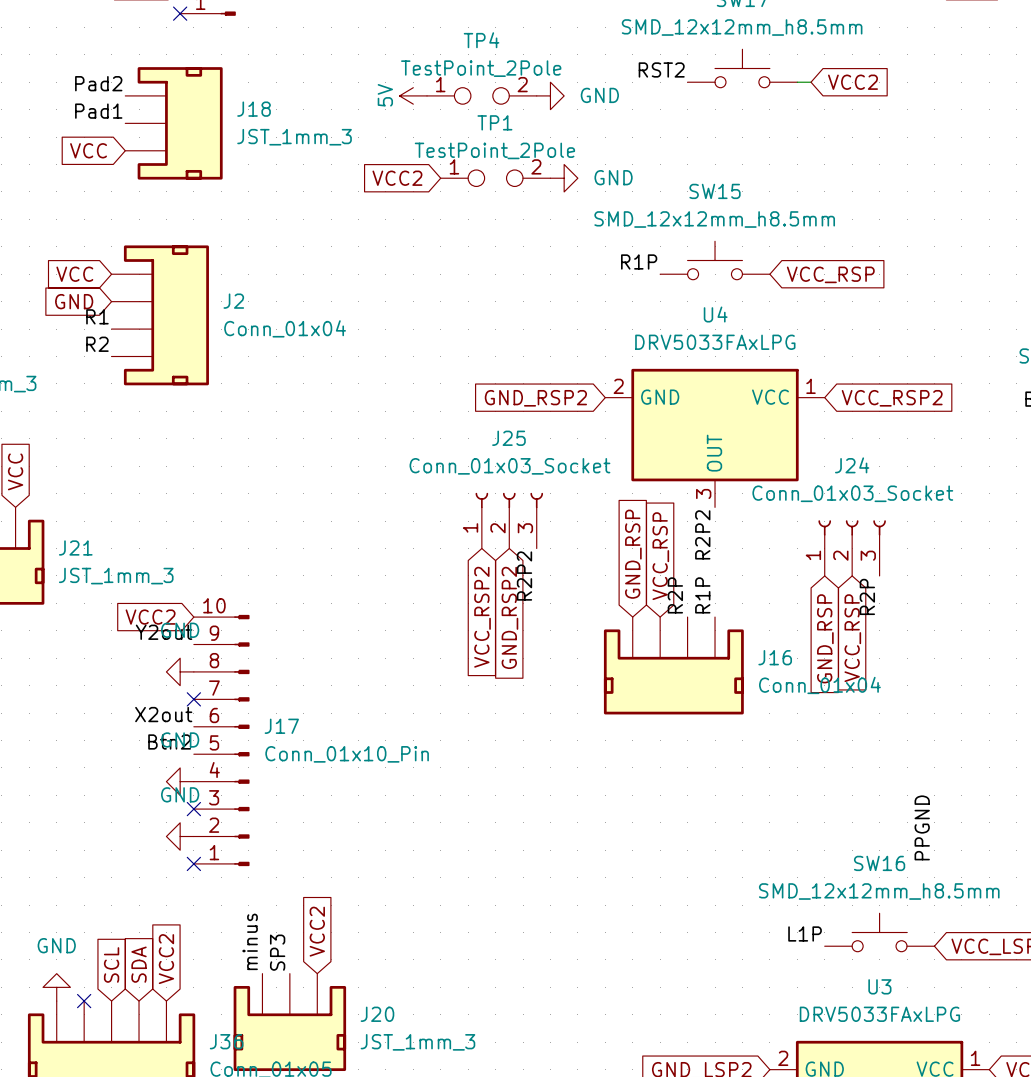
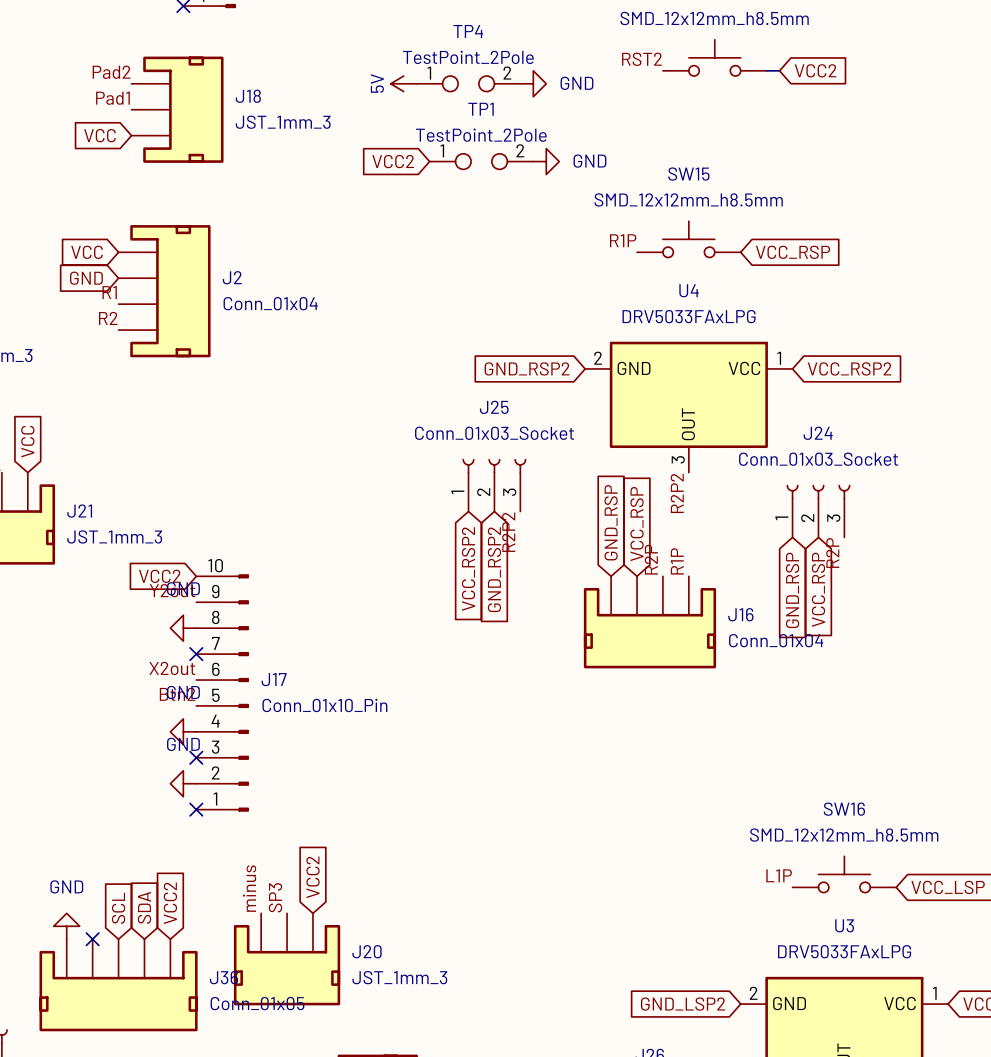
label: PPGND (922, 827) -> none

